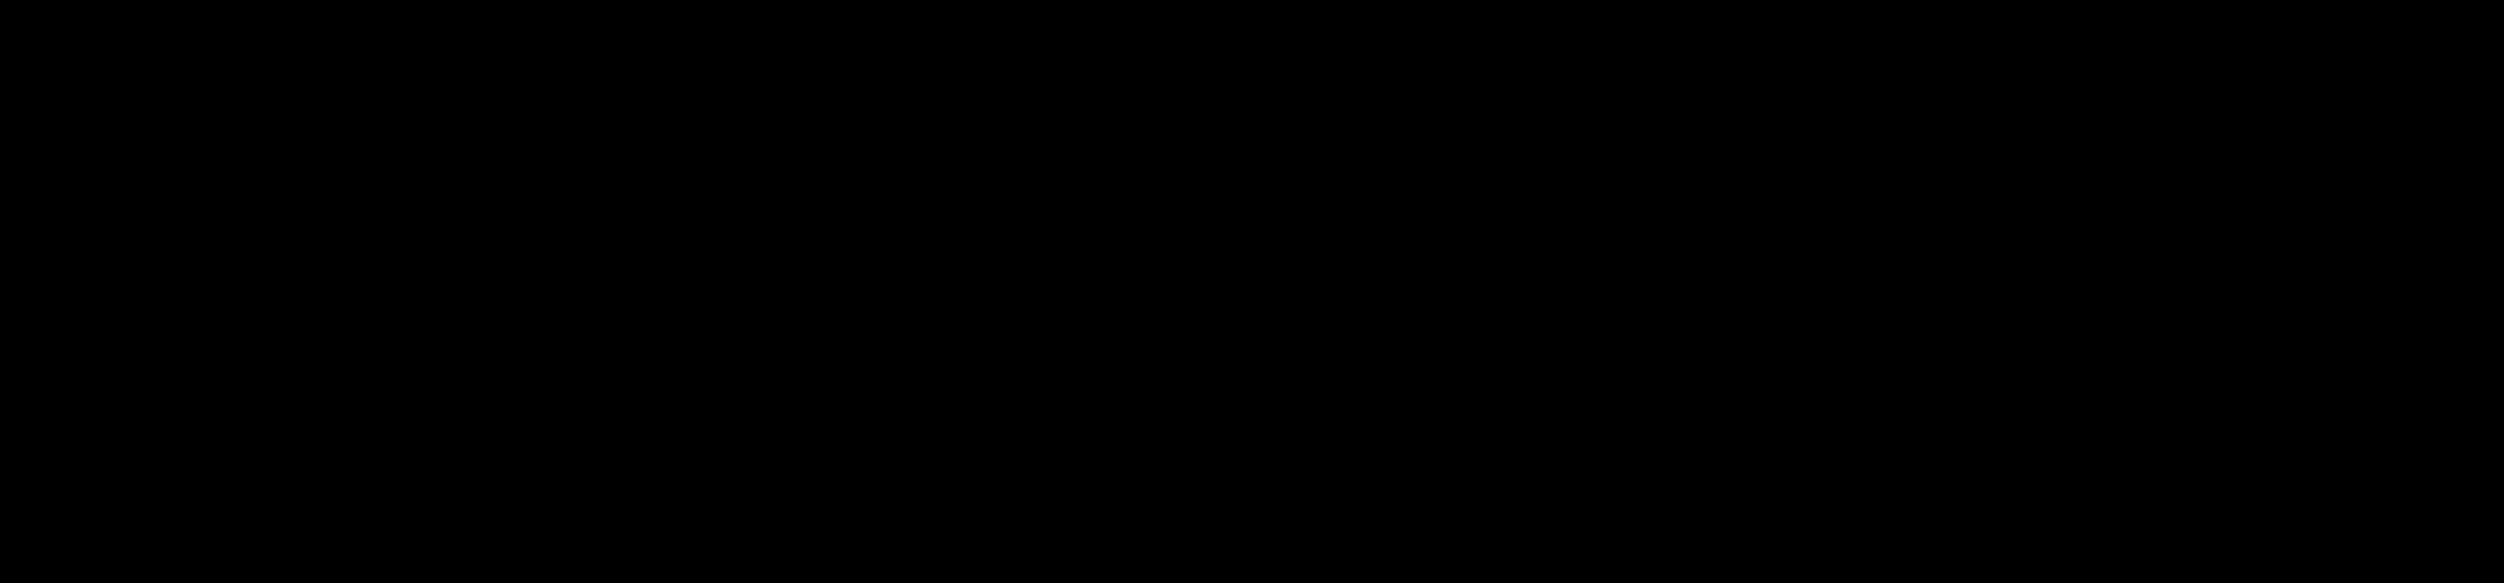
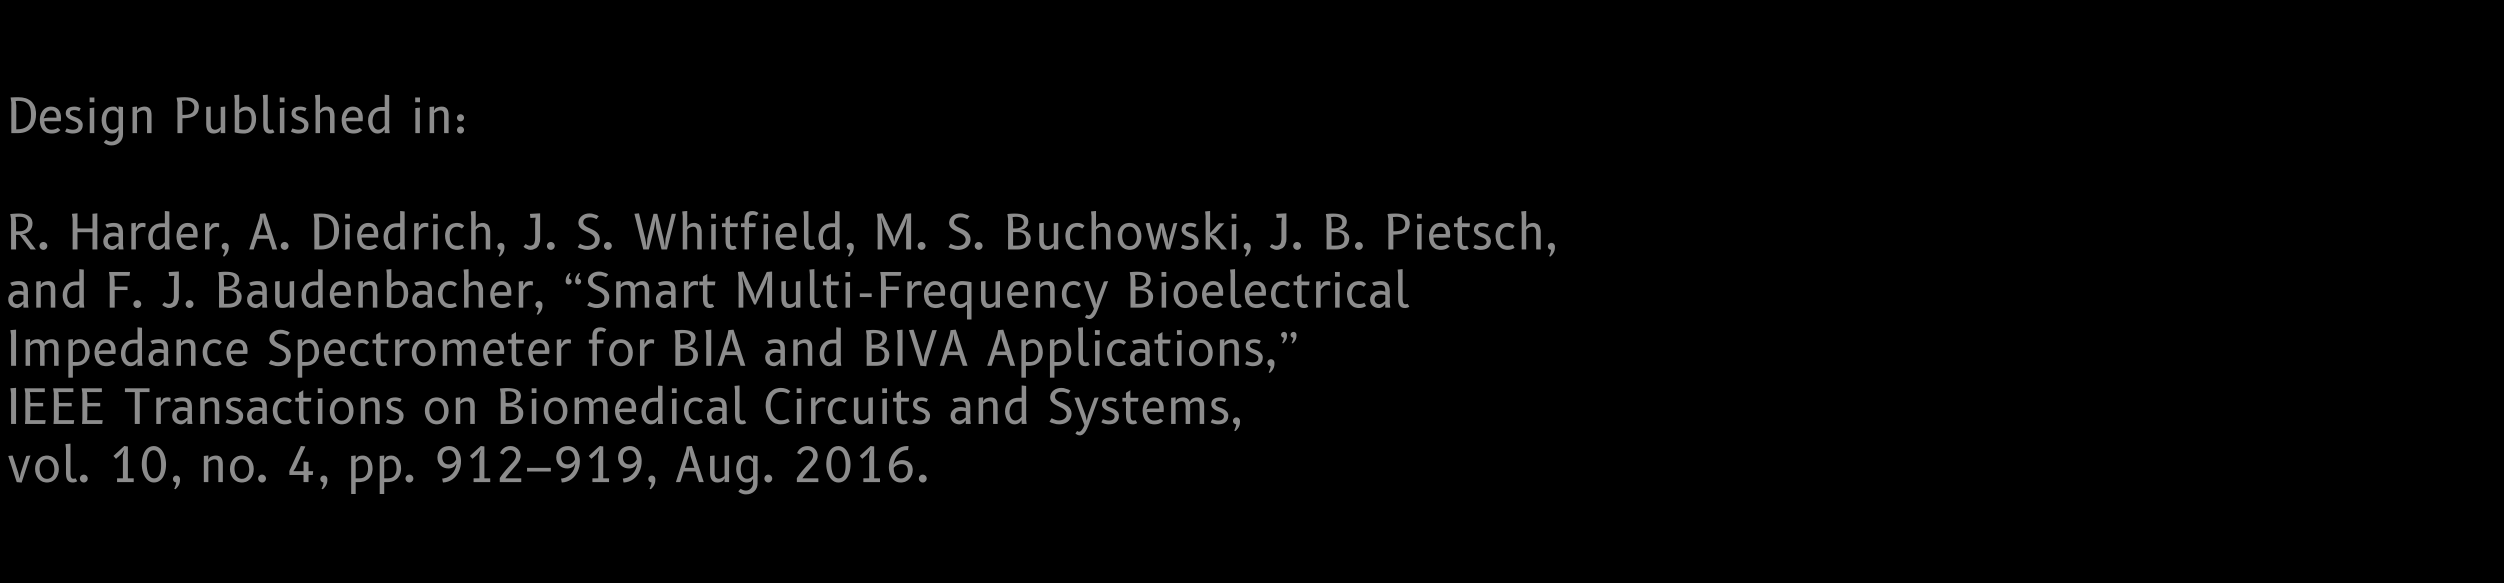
text: none -> Design Published in: (237, 120)
text: none -> R. Harder, A. Diedrich, J. S. Whitfield, M. S. Buchowski, J. B. Pietsch, (782, 233)
text: none -> and F. J. Baudenbacher, “Smart Multi-Frequency Bioelectrical (708, 294)
text: none -> Impedance Spectrometer for BIA and BIVA Applications,” (653, 352)
text: none -> IEEE Transactions on Biomedical Circuits and Systems, (625, 410)
text: none -> vol. 10, no. 4, pp. 912–919, Aug. 2016. (467, 469)

